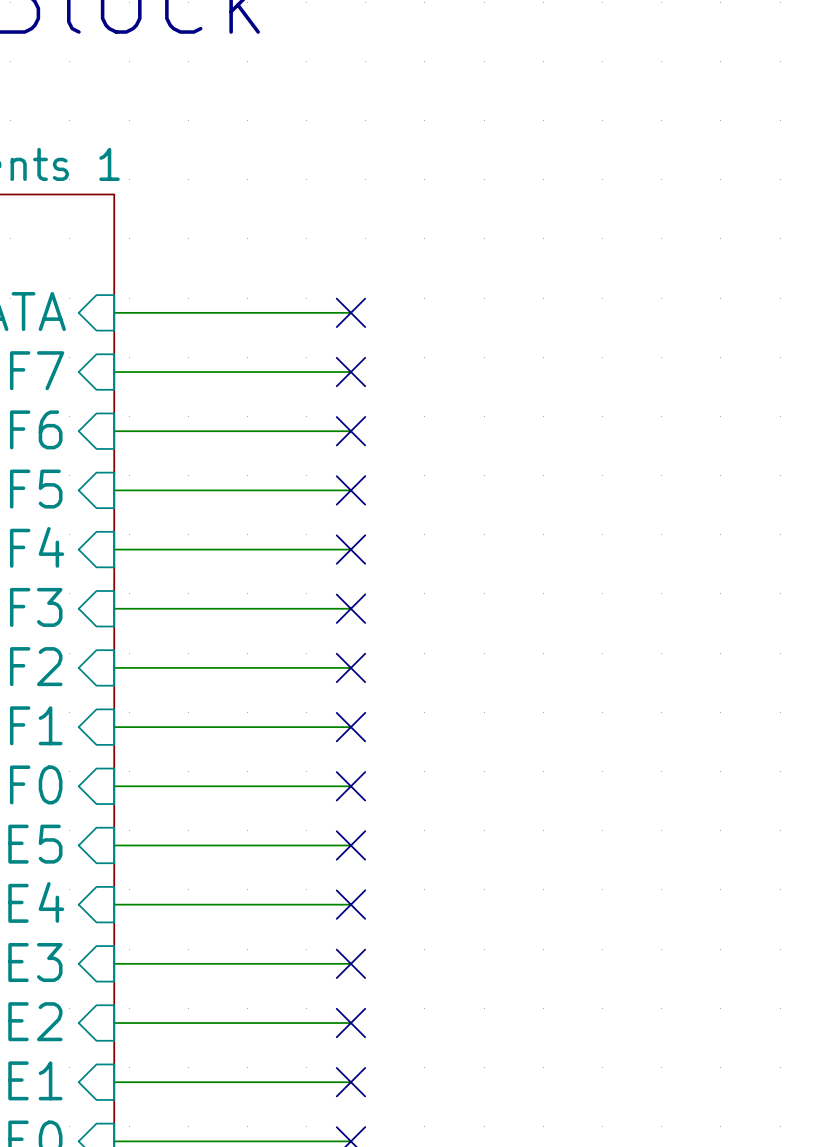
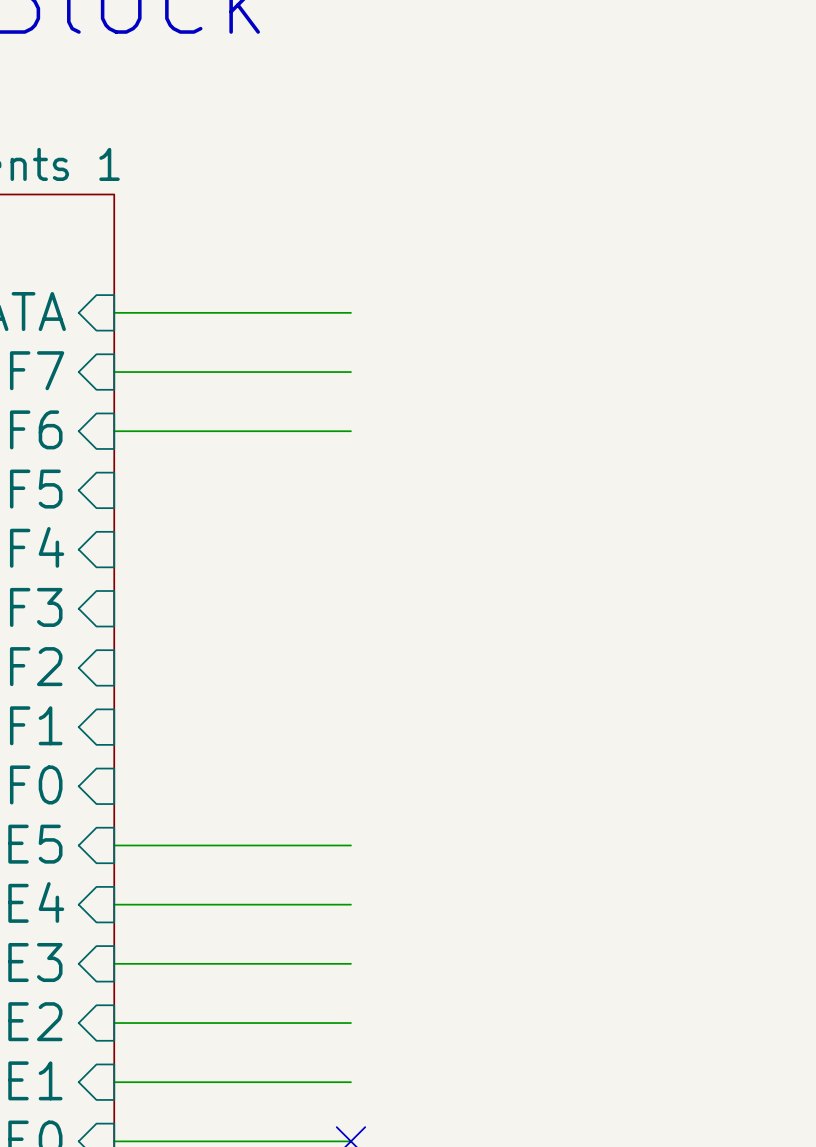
no-connect mark: (350, 312) -> none
no-connect mark: (350, 372) -> none
no-connect mark: (350, 431) -> none
wire: (114, 490) (350, 490) -> none
no-connect mark: (350, 490) -> none
wire: (114, 549) (350, 549) -> none
no-connect mark: (350, 549) -> none
wire: (114, 608) (350, 608) -> none
no-connect mark: (350, 608) -> none
wire: (114, 667) (350, 667) -> none
no-connect mark: (350, 667) -> none
wire: (114, 727) (350, 727) -> none
no-connect mark: (350, 727) -> none
wire: (114, 786) (350, 786) -> none
no-connect mark: (350, 786) -> none
no-connect mark: (350, 845) -> none
no-connect mark: (350, 904) -> none
no-connect mark: (350, 963) -> none
no-connect mark: (350, 1023) -> none
no-connect mark: (350, 1082) -> none

